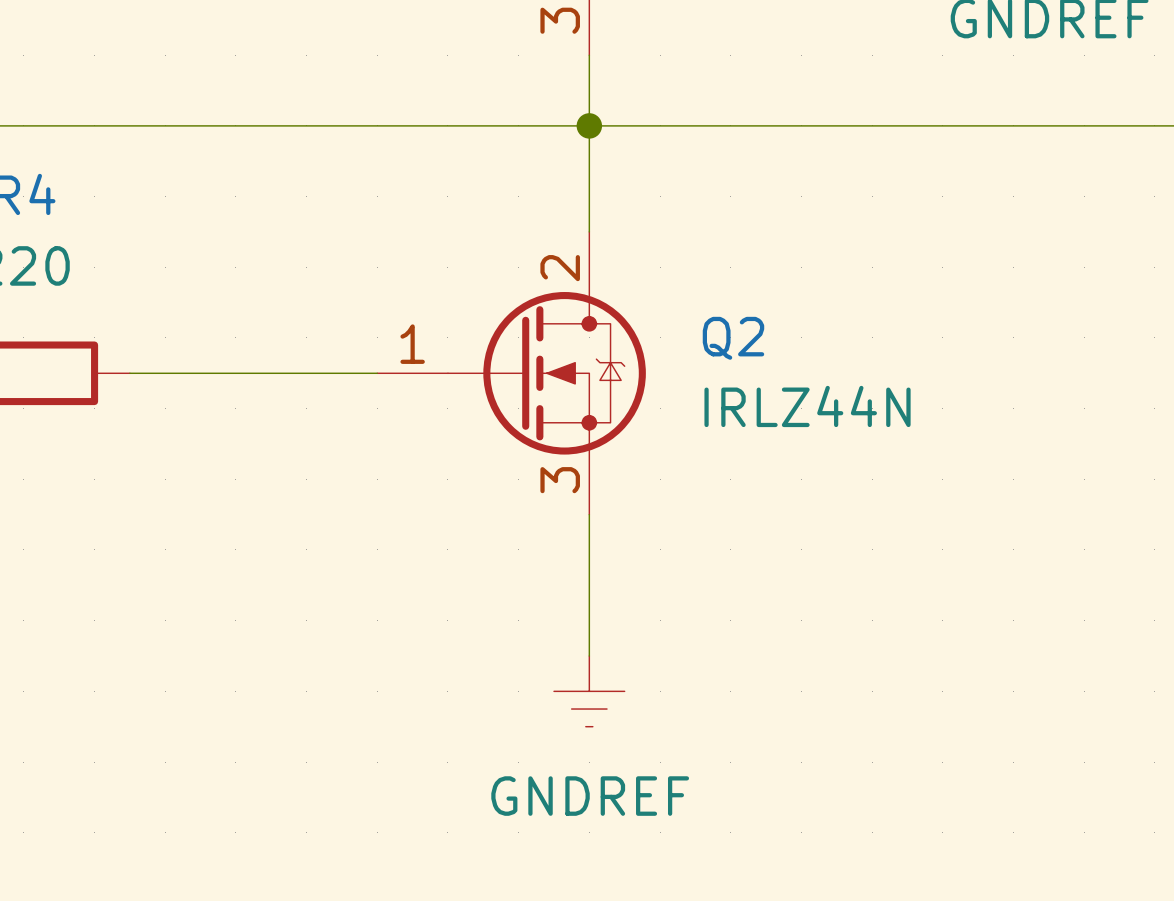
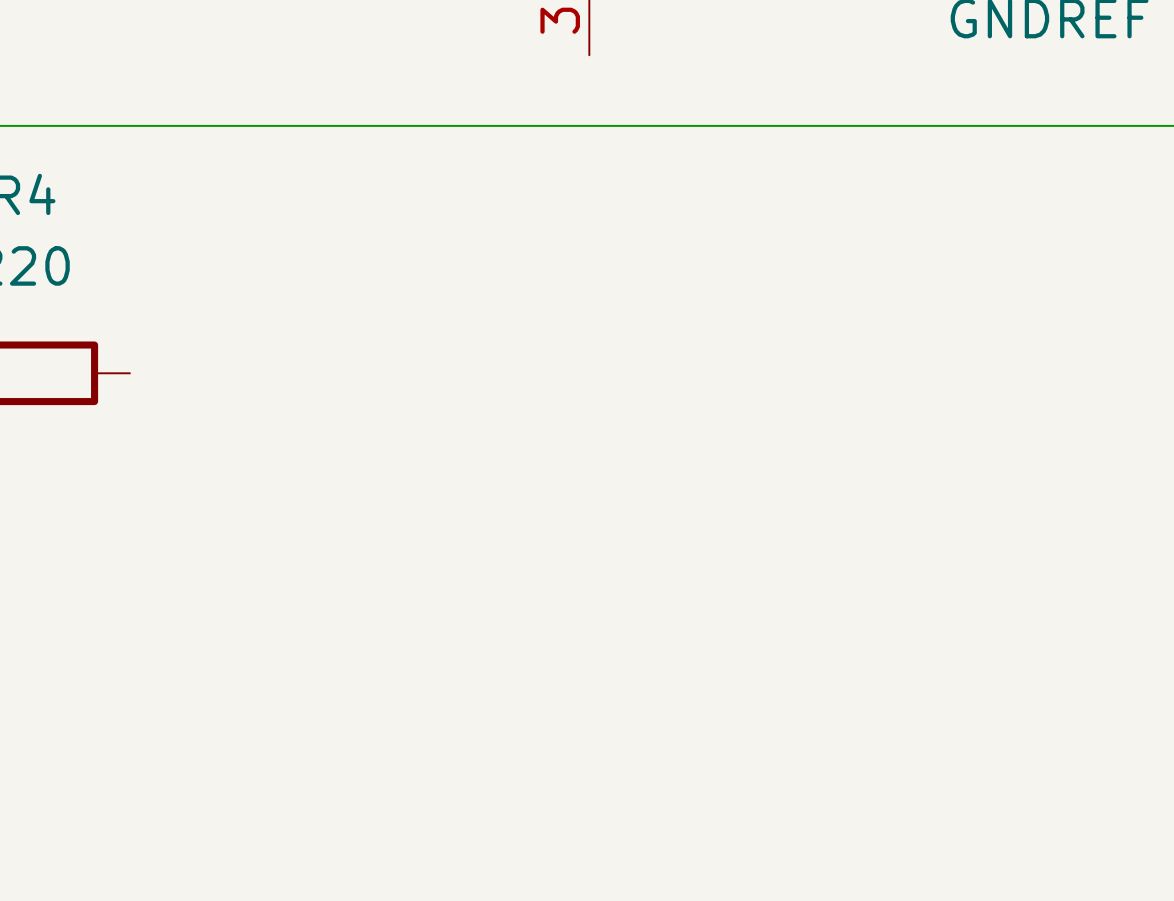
wire: (589, 55) (589, 231) -> none
junction: (589, 125) -> none
wire: (129, 373) (377, 373) -> none
Q2: IRLZ44N (511, 373) -> none
wire: (589, 514) (589, 656) -> none
power symbol: GNDREF (589, 691) -> none

